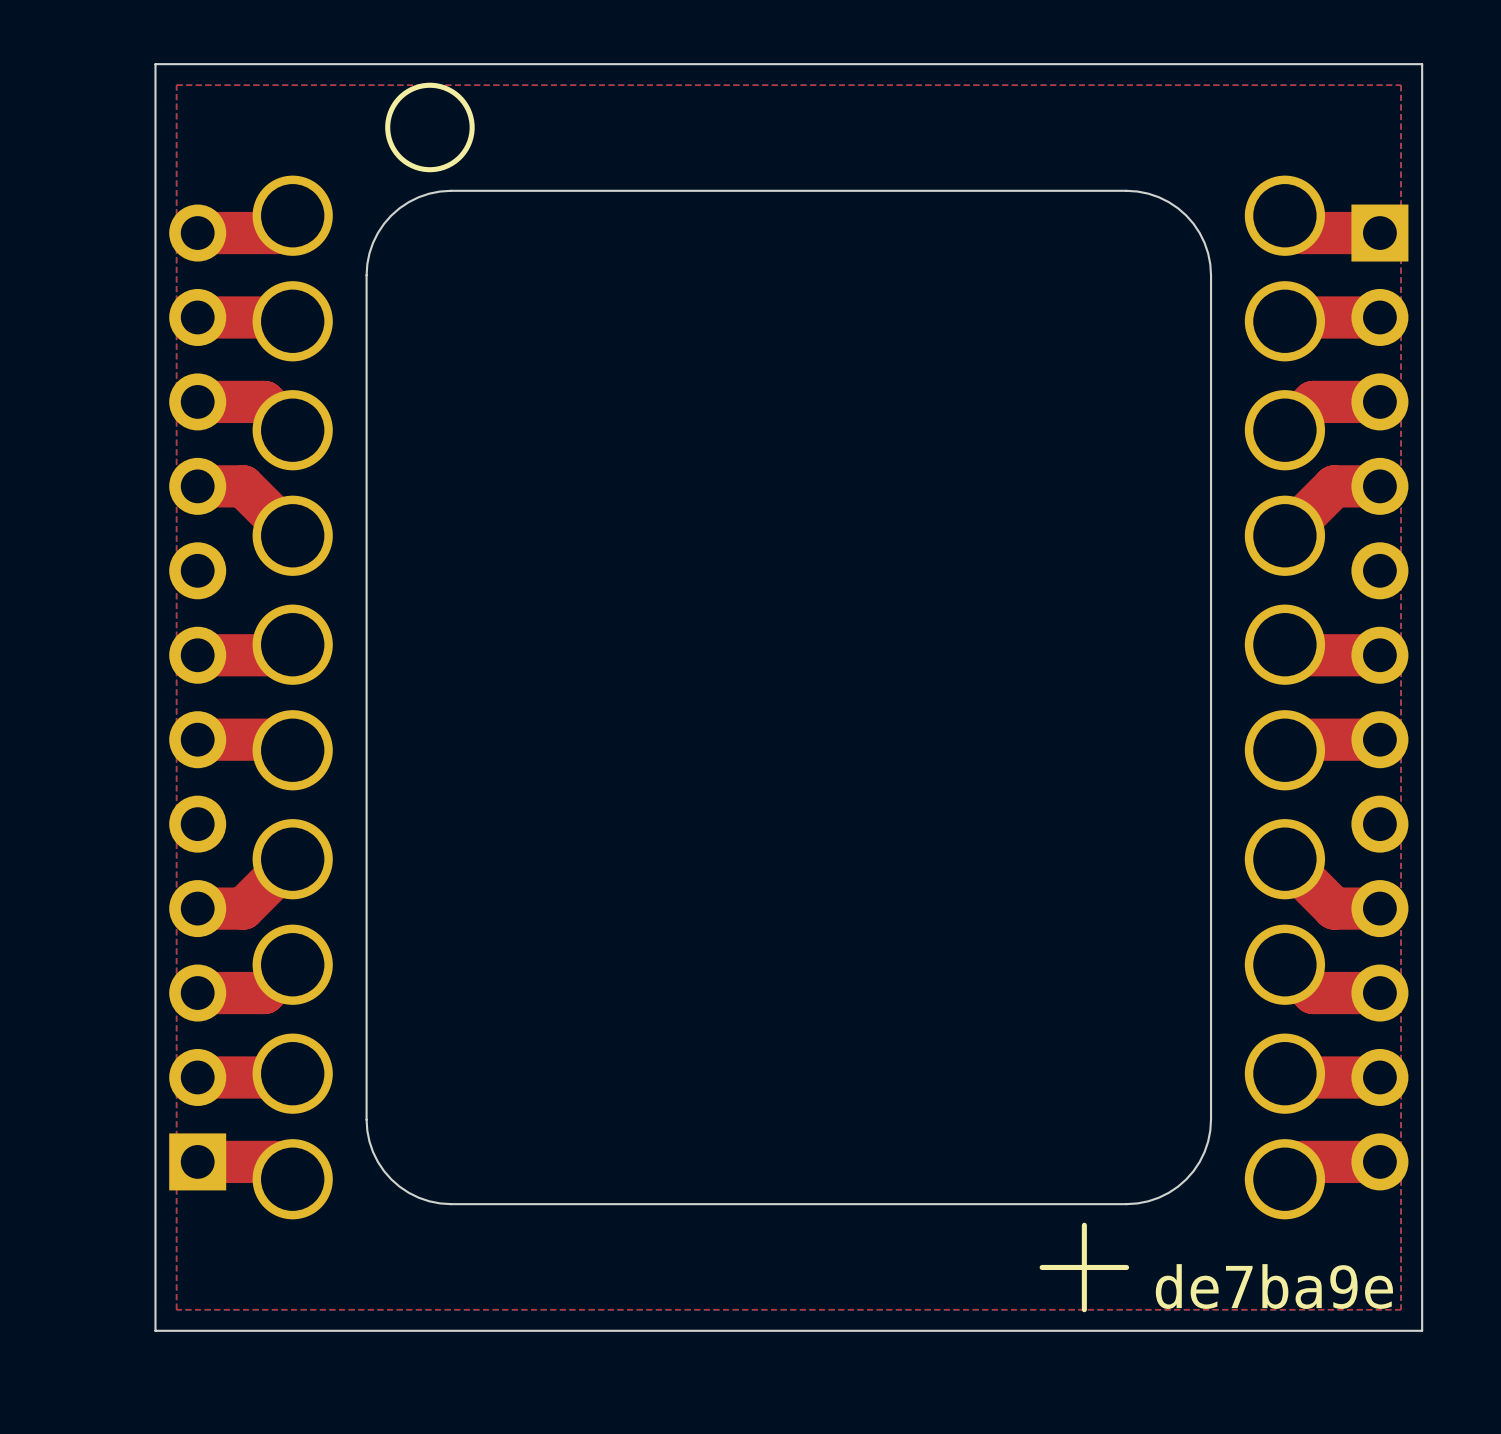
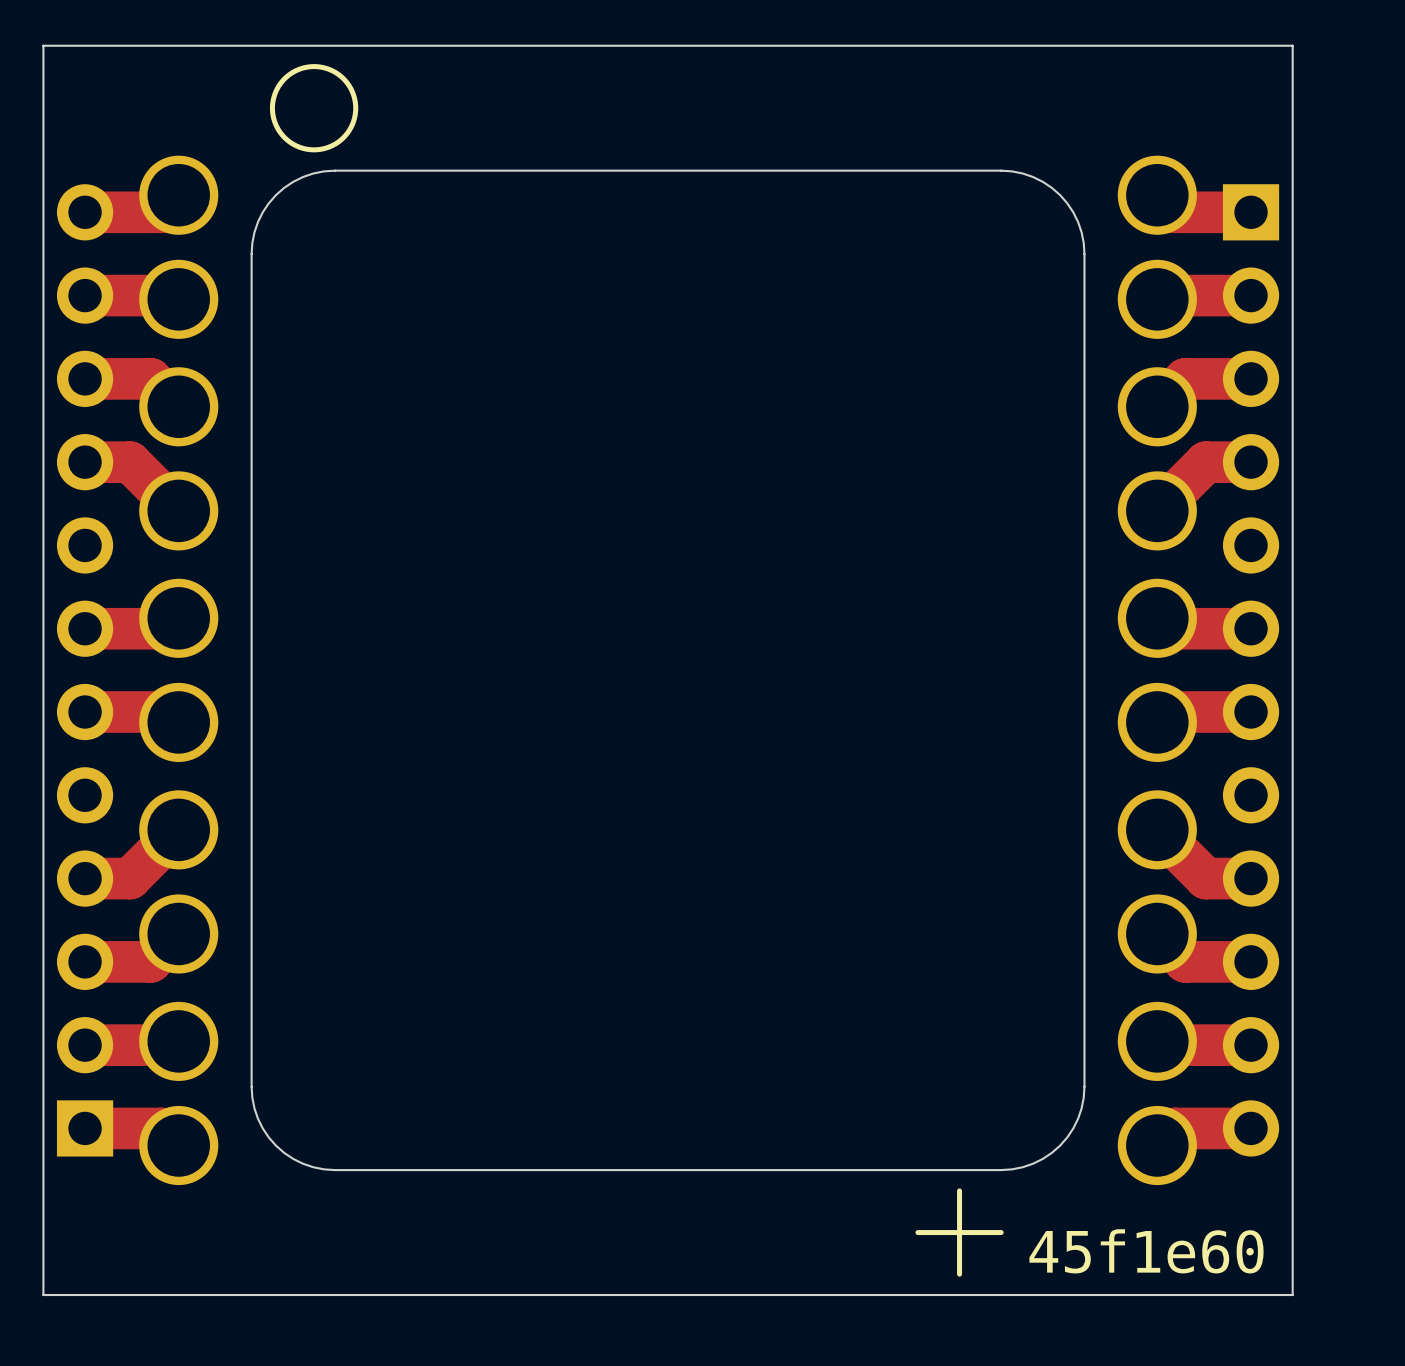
top zone outline: (176, 85) (176, 1309) (1401, 1309) (1401, 85) (176, 85) -> none
text: de7ba9e (1274, 1286) -> 45f1e60 (1146, 1251)

